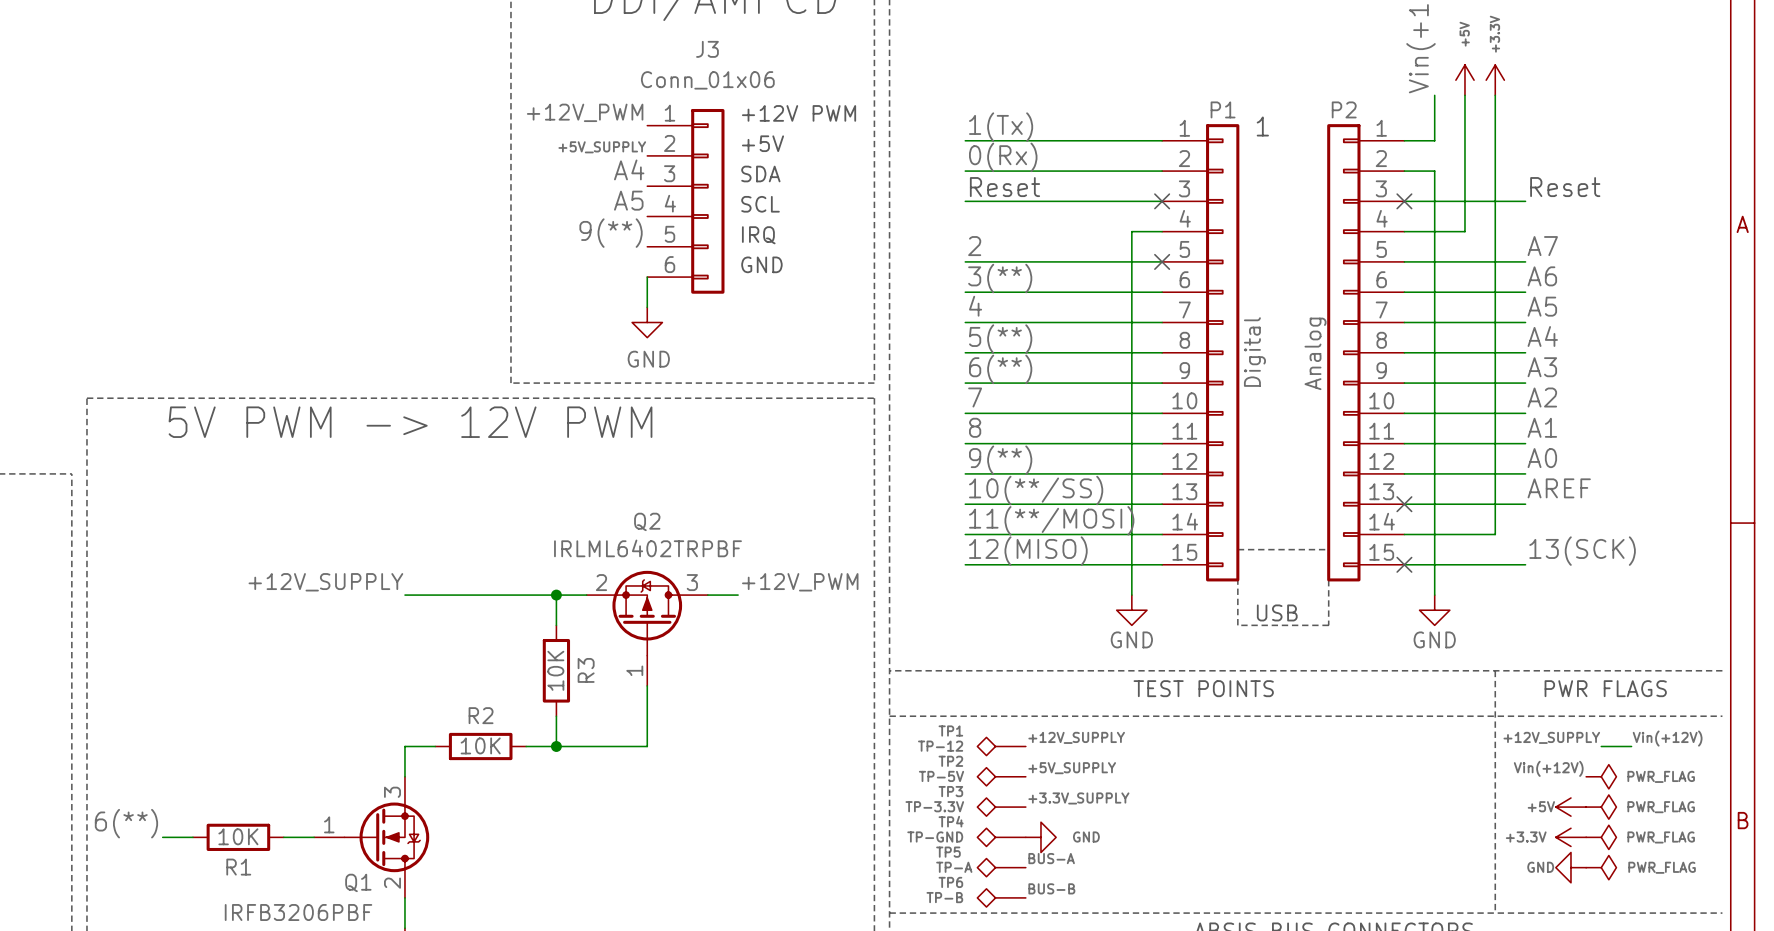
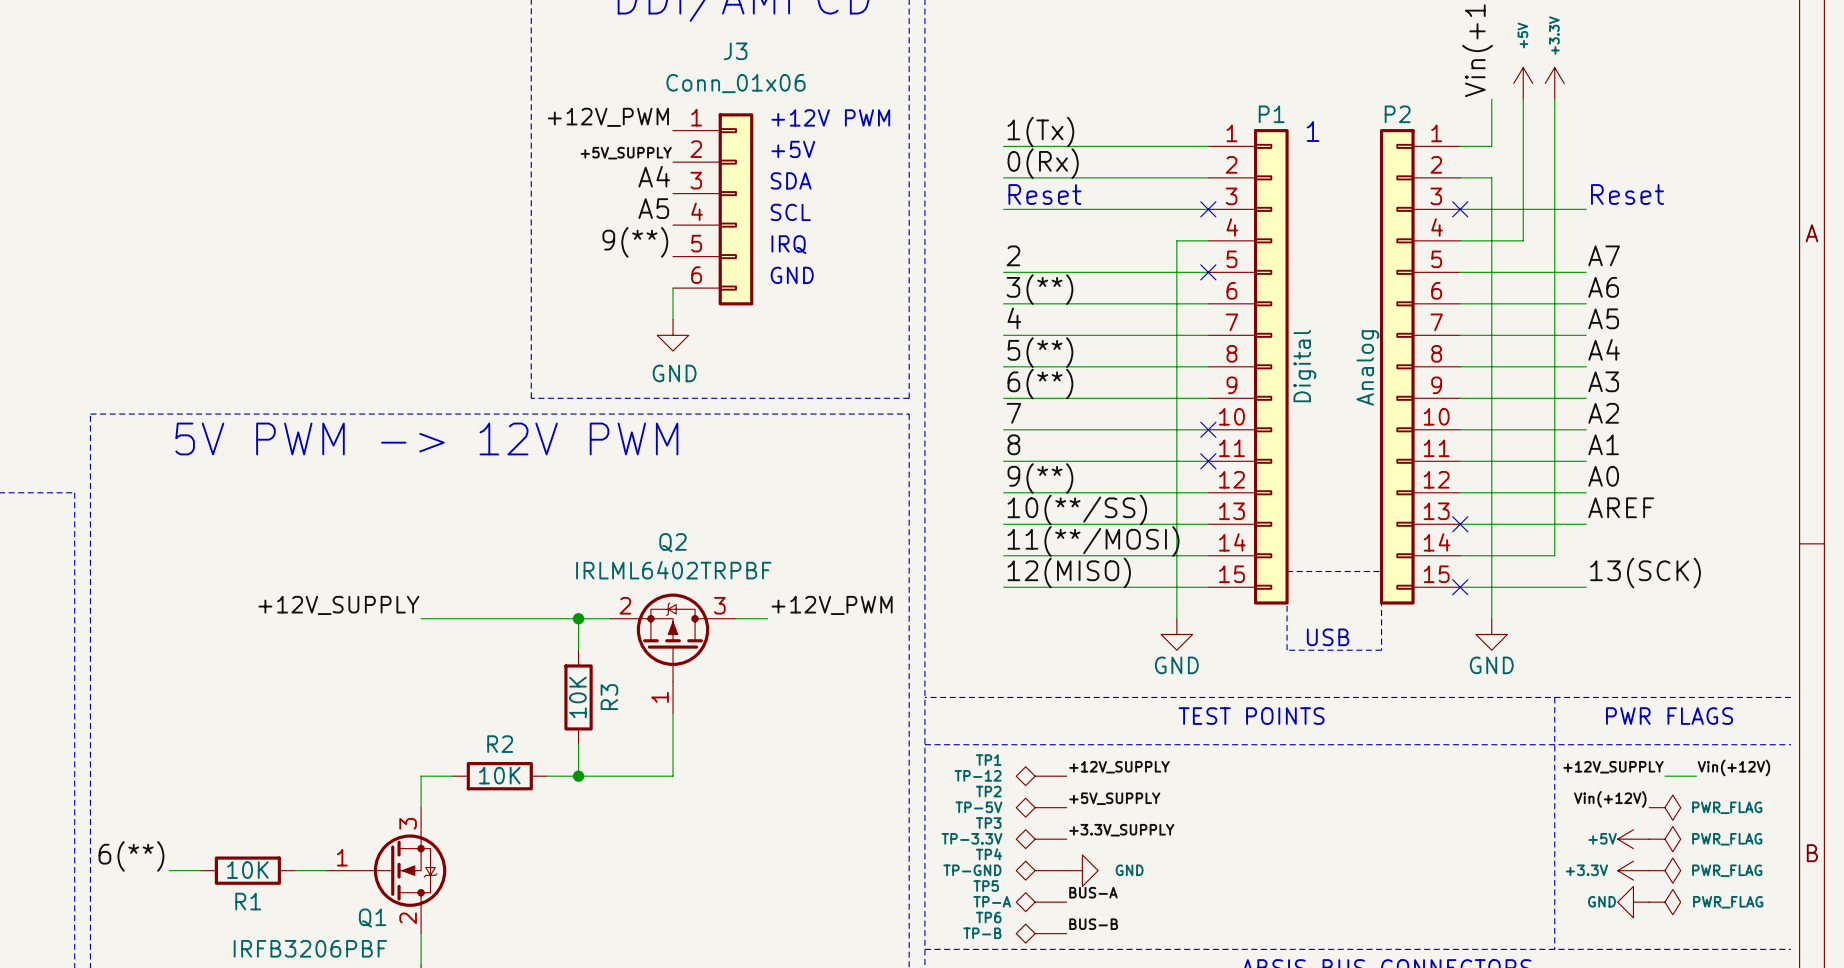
no-connect mark: none -> (1208, 429)
no-connect mark: none -> (1208, 461)

